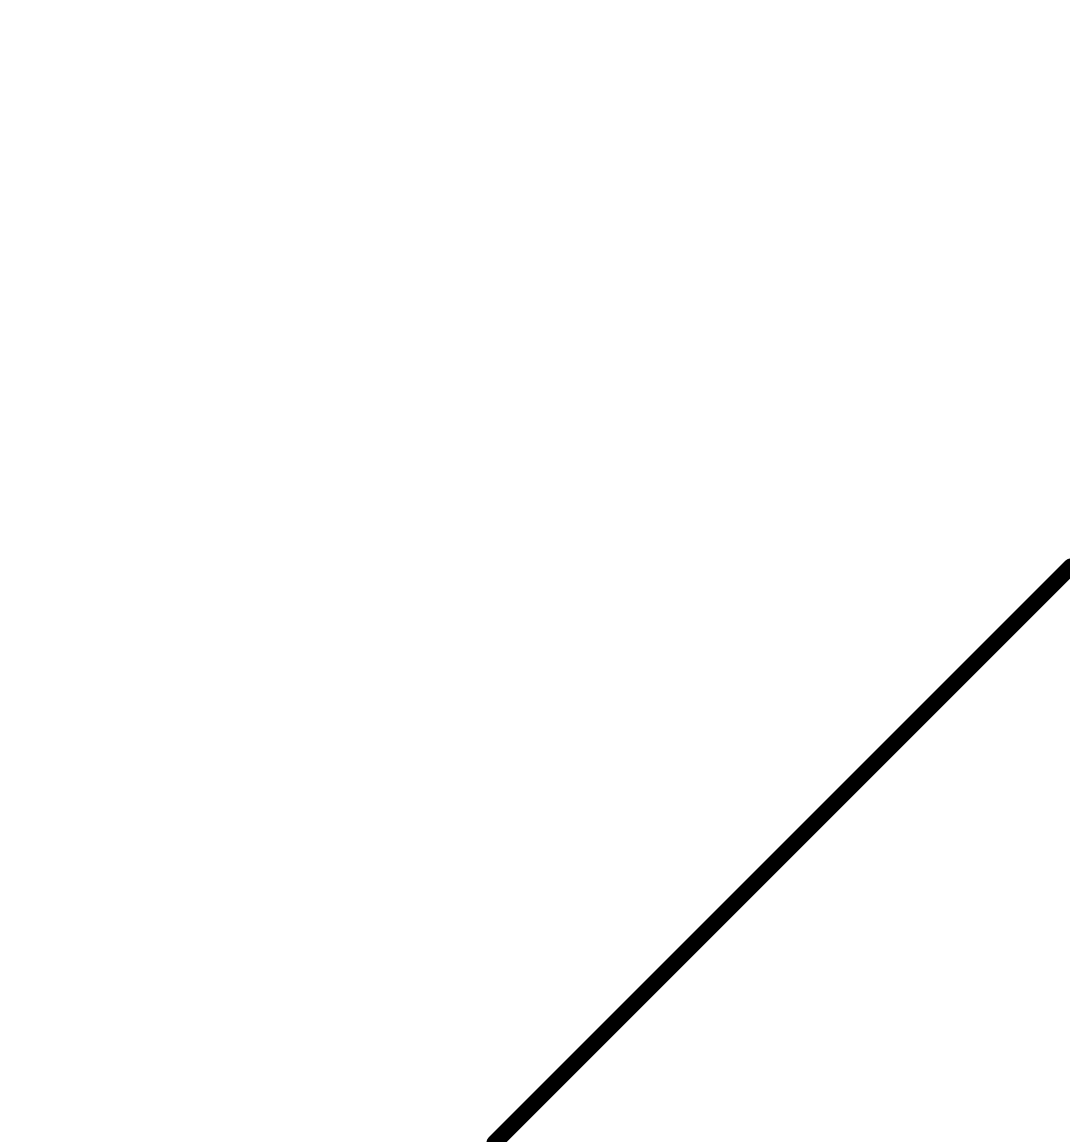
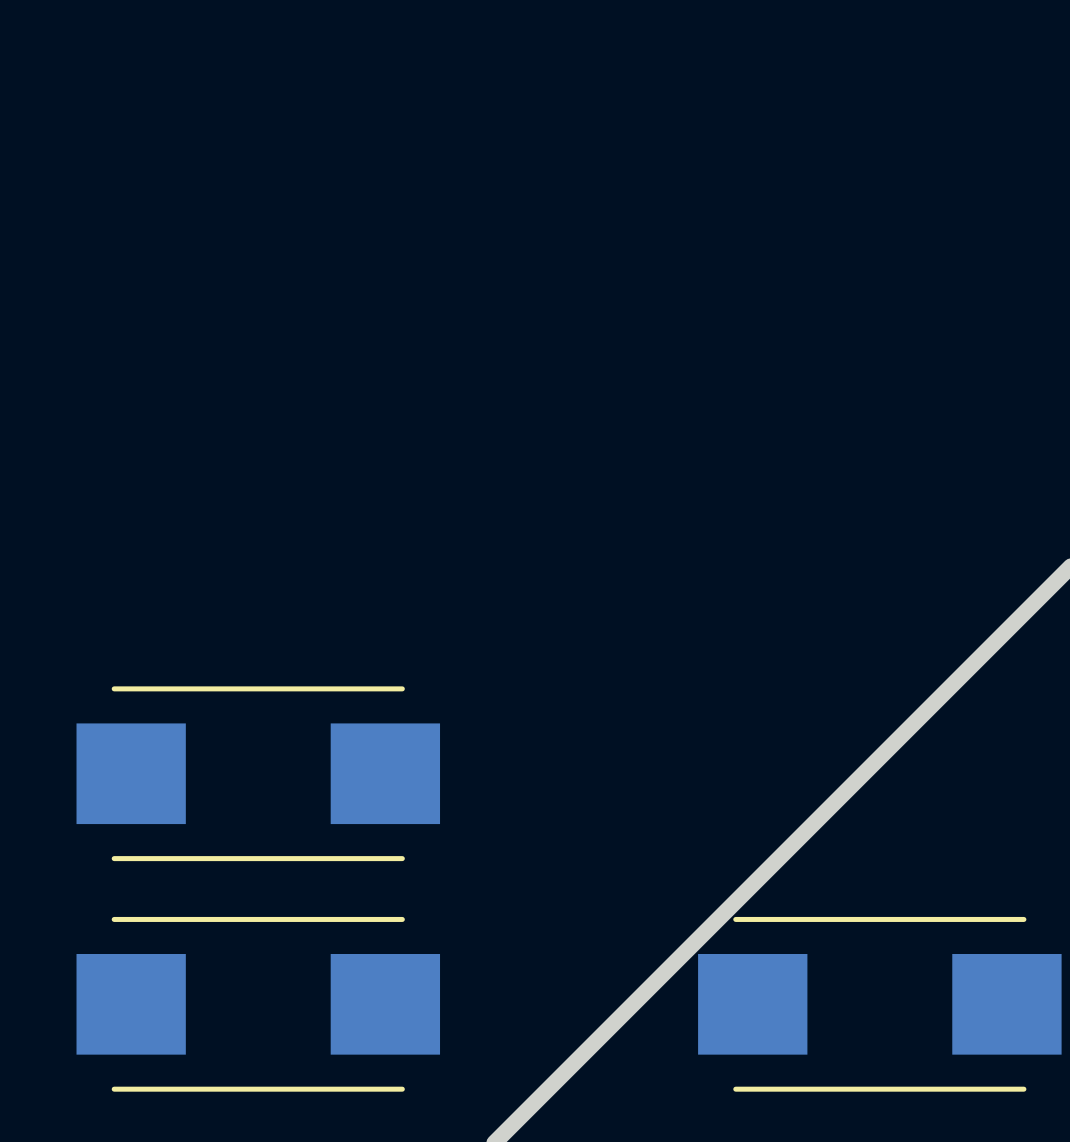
part: none -> (258, 773)
part: none -> (258, 1004)
part: none -> (879, 1004)

